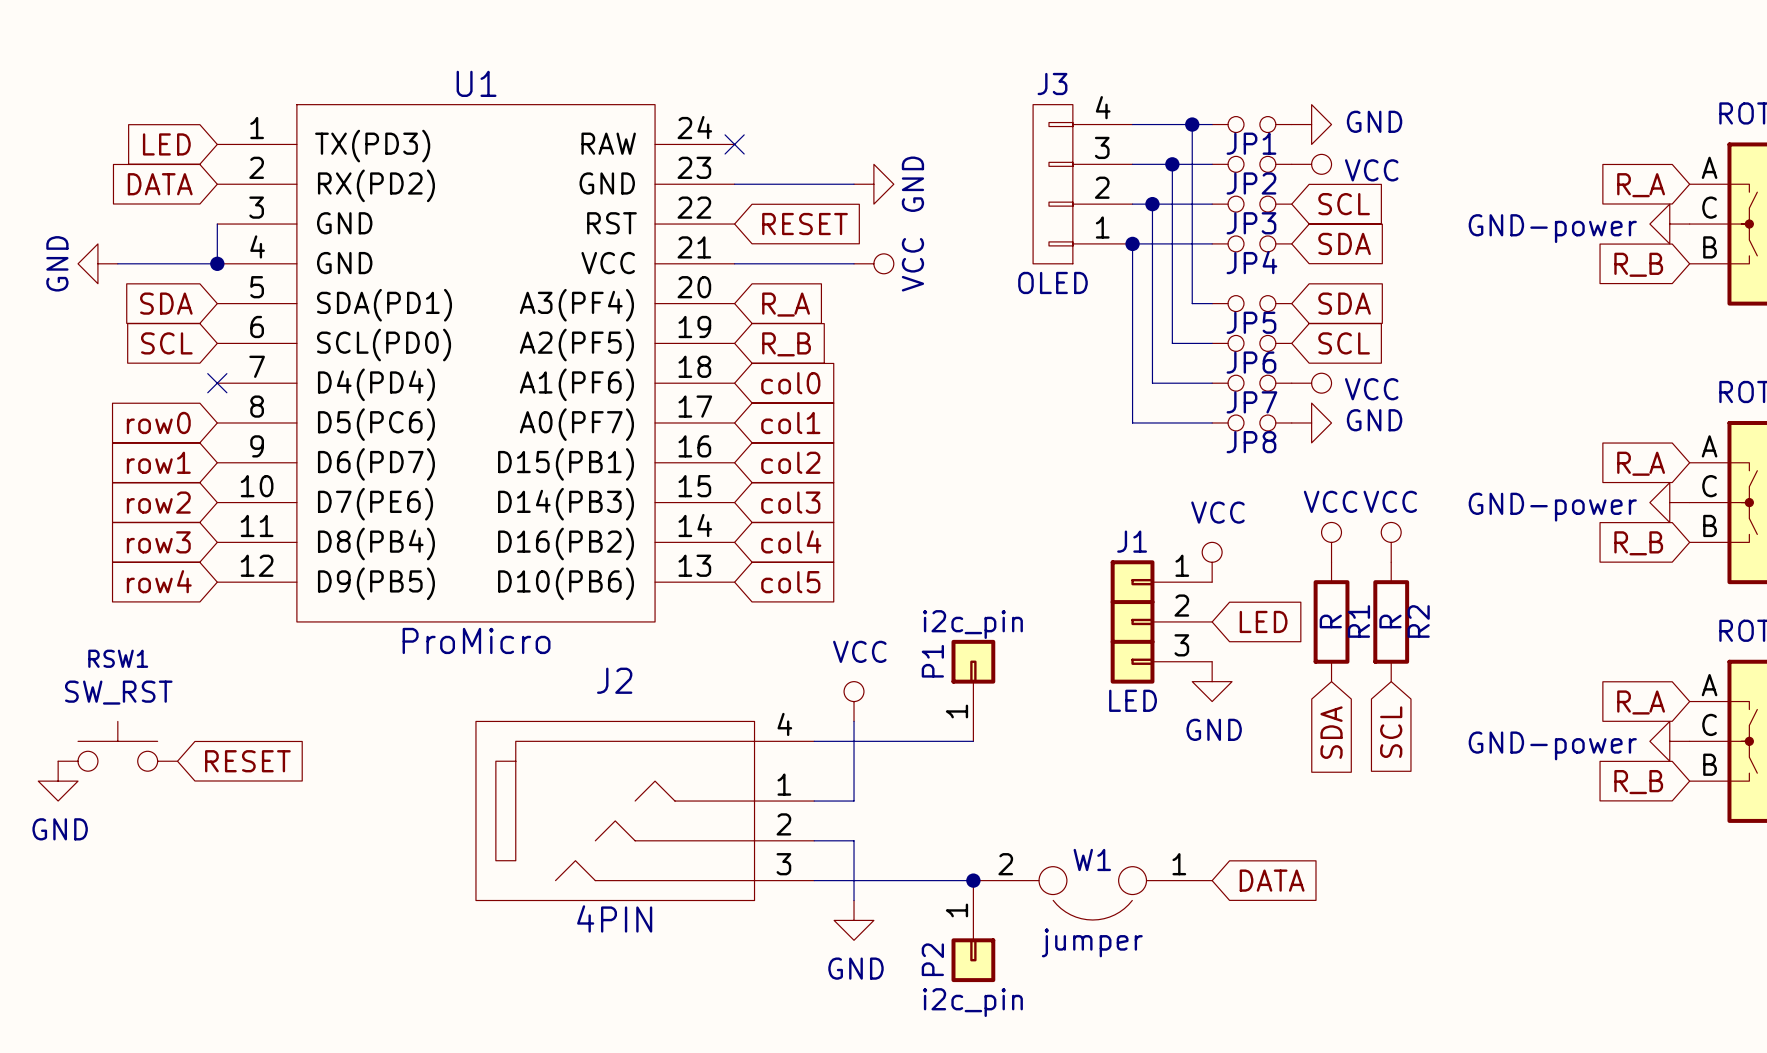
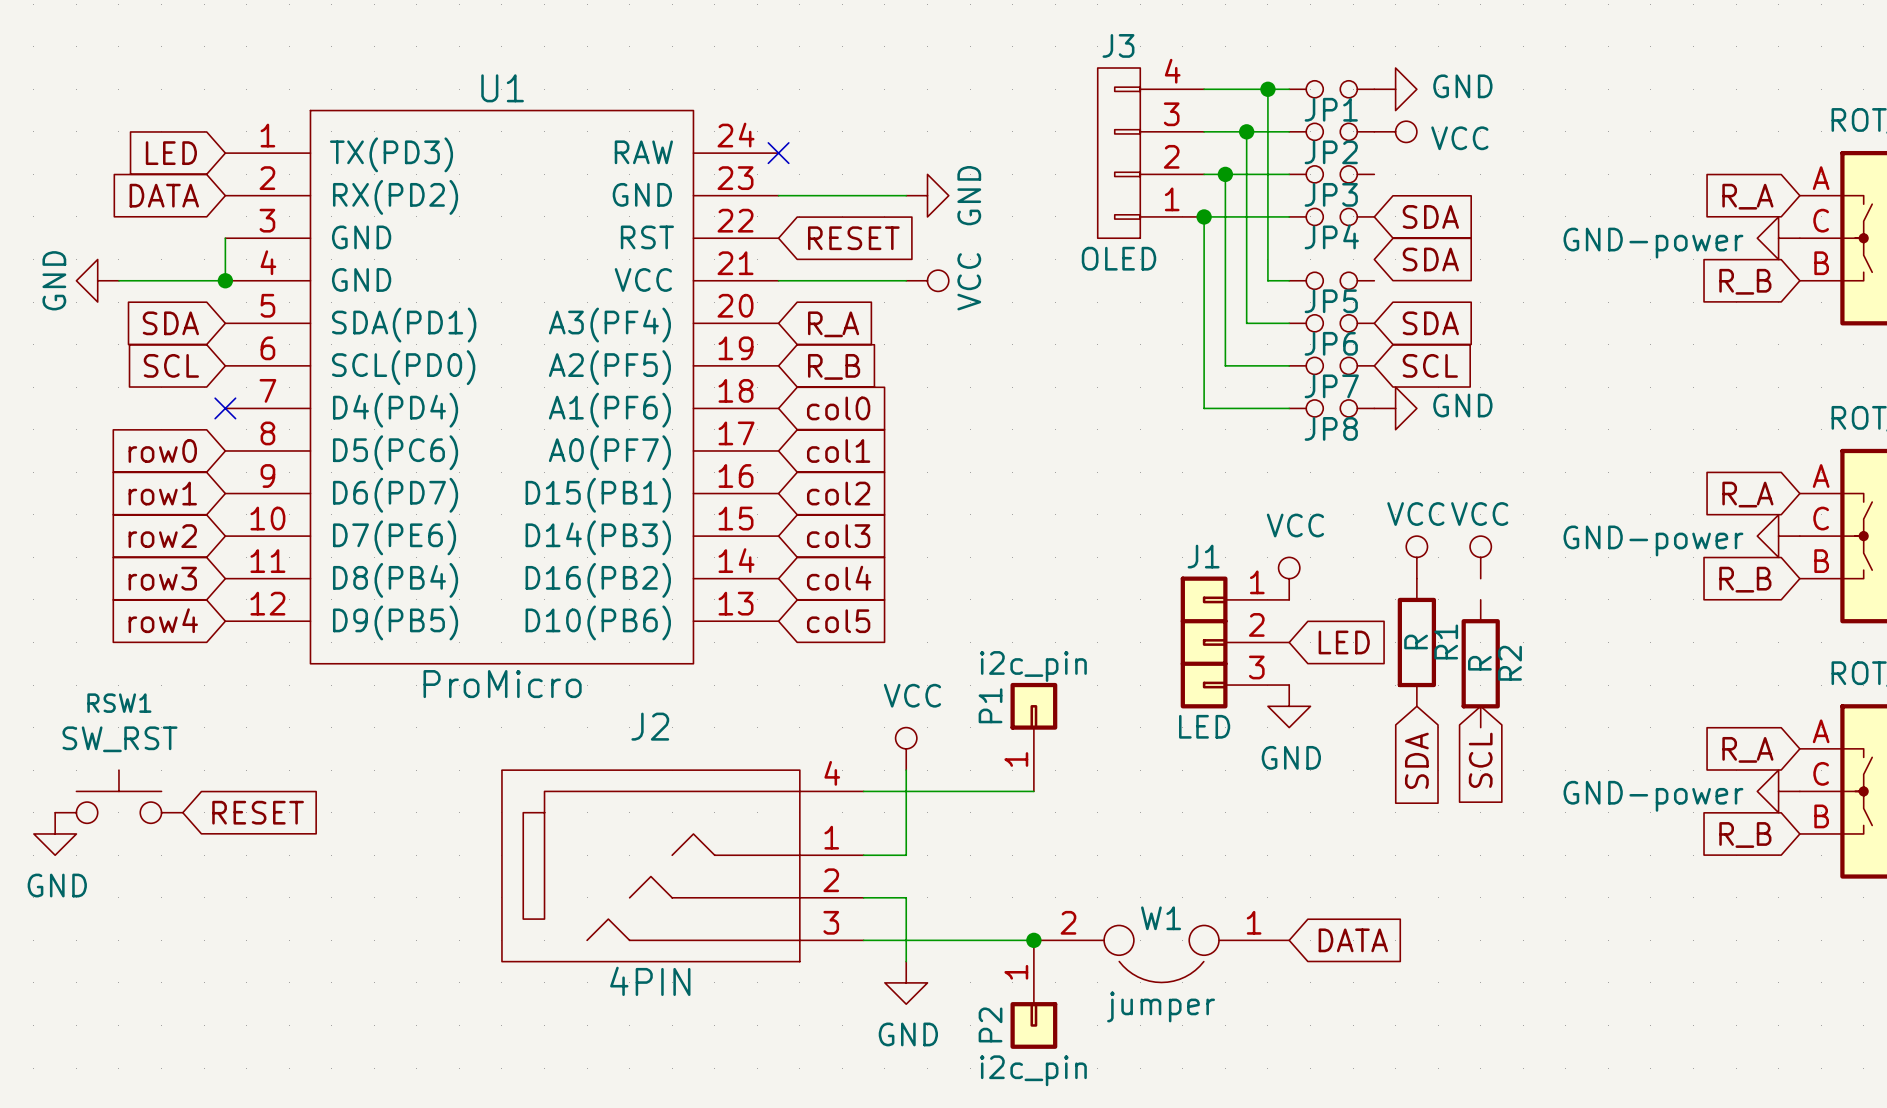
wire: none -> (1204, 89) (1289, 89)
wire: none -> (1267, 89) (1267, 131)
junction: none -> (1267, 89)
JP1: none -> (1331, 89)
power symbol: none -> GND (1395, 89)
wire: none -> (1246, 131) (1246, 174)
junction: none -> (1246, 131)
junction: (1192, 124) -> none
power symbol: GND (1311, 124) -> VCC (1395, 131)
JP1 name: JP1 (1251, 143) -> JP2 (1331, 152)
wire: none -> (1225, 174) (1225, 216)
junction: none -> (1225, 174)
junction: (1172, 164) -> none
power symbol: VCC (1311, 164) -> none
JP2 name: JP2 (1251, 183) -> JP3 (1331, 194)
J3 position: (1082, 184) -> (1150, 153)
junction: none -> (1204, 216)
junction: (1152, 204) -> none
global label: SCL (1344, 204) -> SDA (1430, 216)
JP3 name: JP3 (1251, 223) -> JP4 (1331, 236)
wire: (1132, 243) (1212, 243) -> (1204, 259) (1204, 216)
junction: (1132, 243) -> none
JP4: (1251, 243) -> none
wire: (1192, 263) (1192, 303) -> (1267, 280) (1289, 280)
JP5: none -> (1331, 280)
wire: (1172, 303) (1172, 343) -> (1225, 365) (1246, 365)
wire: none -> (1246, 323) (1267, 323)
JP5 name: JP5 (1251, 322) -> JP6 (1331, 343)
wire: (1152, 343) (1152, 383) -> (1204, 408) (1225, 408)
JP6 name: JP6 (1251, 362) -> JP7 (1331, 386)
wire: (1132, 383) (1132, 422) (1212, 422) -> none
power symbol: VCC (1311, 383) -> GND (1395, 408)
JP7 name: JP7 (1251, 402) -> JP8 (1331, 428)
JP8: (1251, 422) -> none
power symbol: GND (1311, 422) -> none
power symbol position: VCC (1331, 542) -> VCC (1416, 557)
power symbol position: VCC (1391, 542) -> VCC (1480, 557)
power symbol position: VCC (1212, 562) -> VCC (1289, 578)
J1 position: (1161, 621) -> (1234, 642)
global label position: LED (1263, 621) -> LED (1344, 642)
R1 position: (1331, 621) -> (1416, 642)
power symbol position: GND (1212, 681) -> GND (1289, 706)
global label position: SDA (1331, 732) -> SDA (1416, 760)
global label position: SCL (1391, 732) -> SCL (1480, 760)

